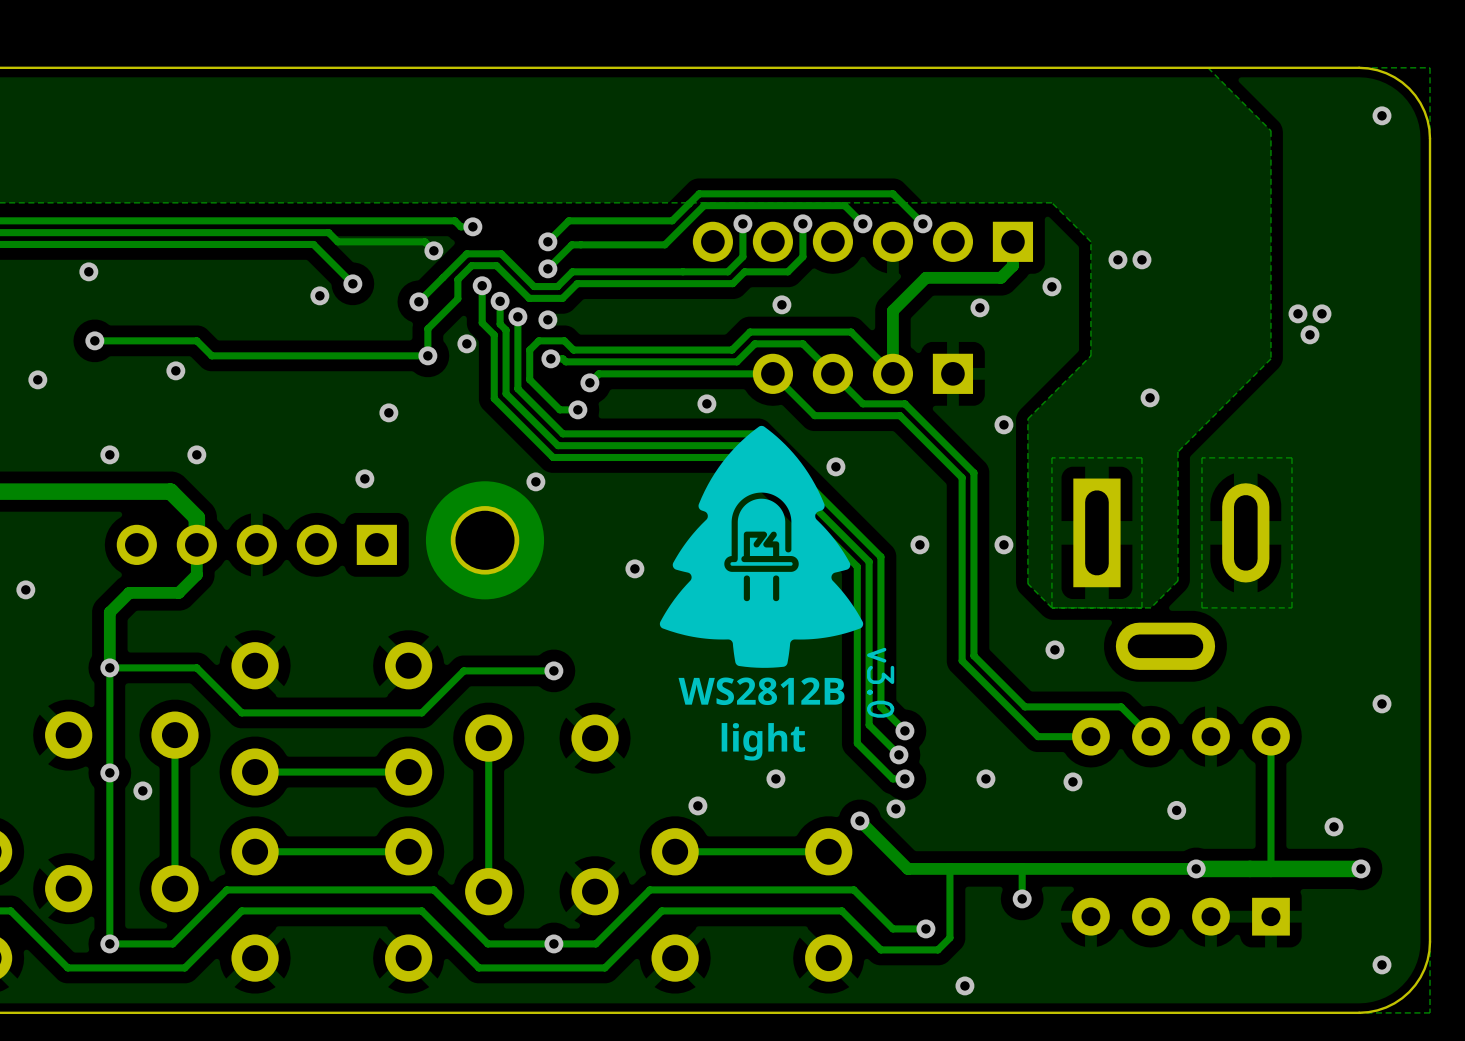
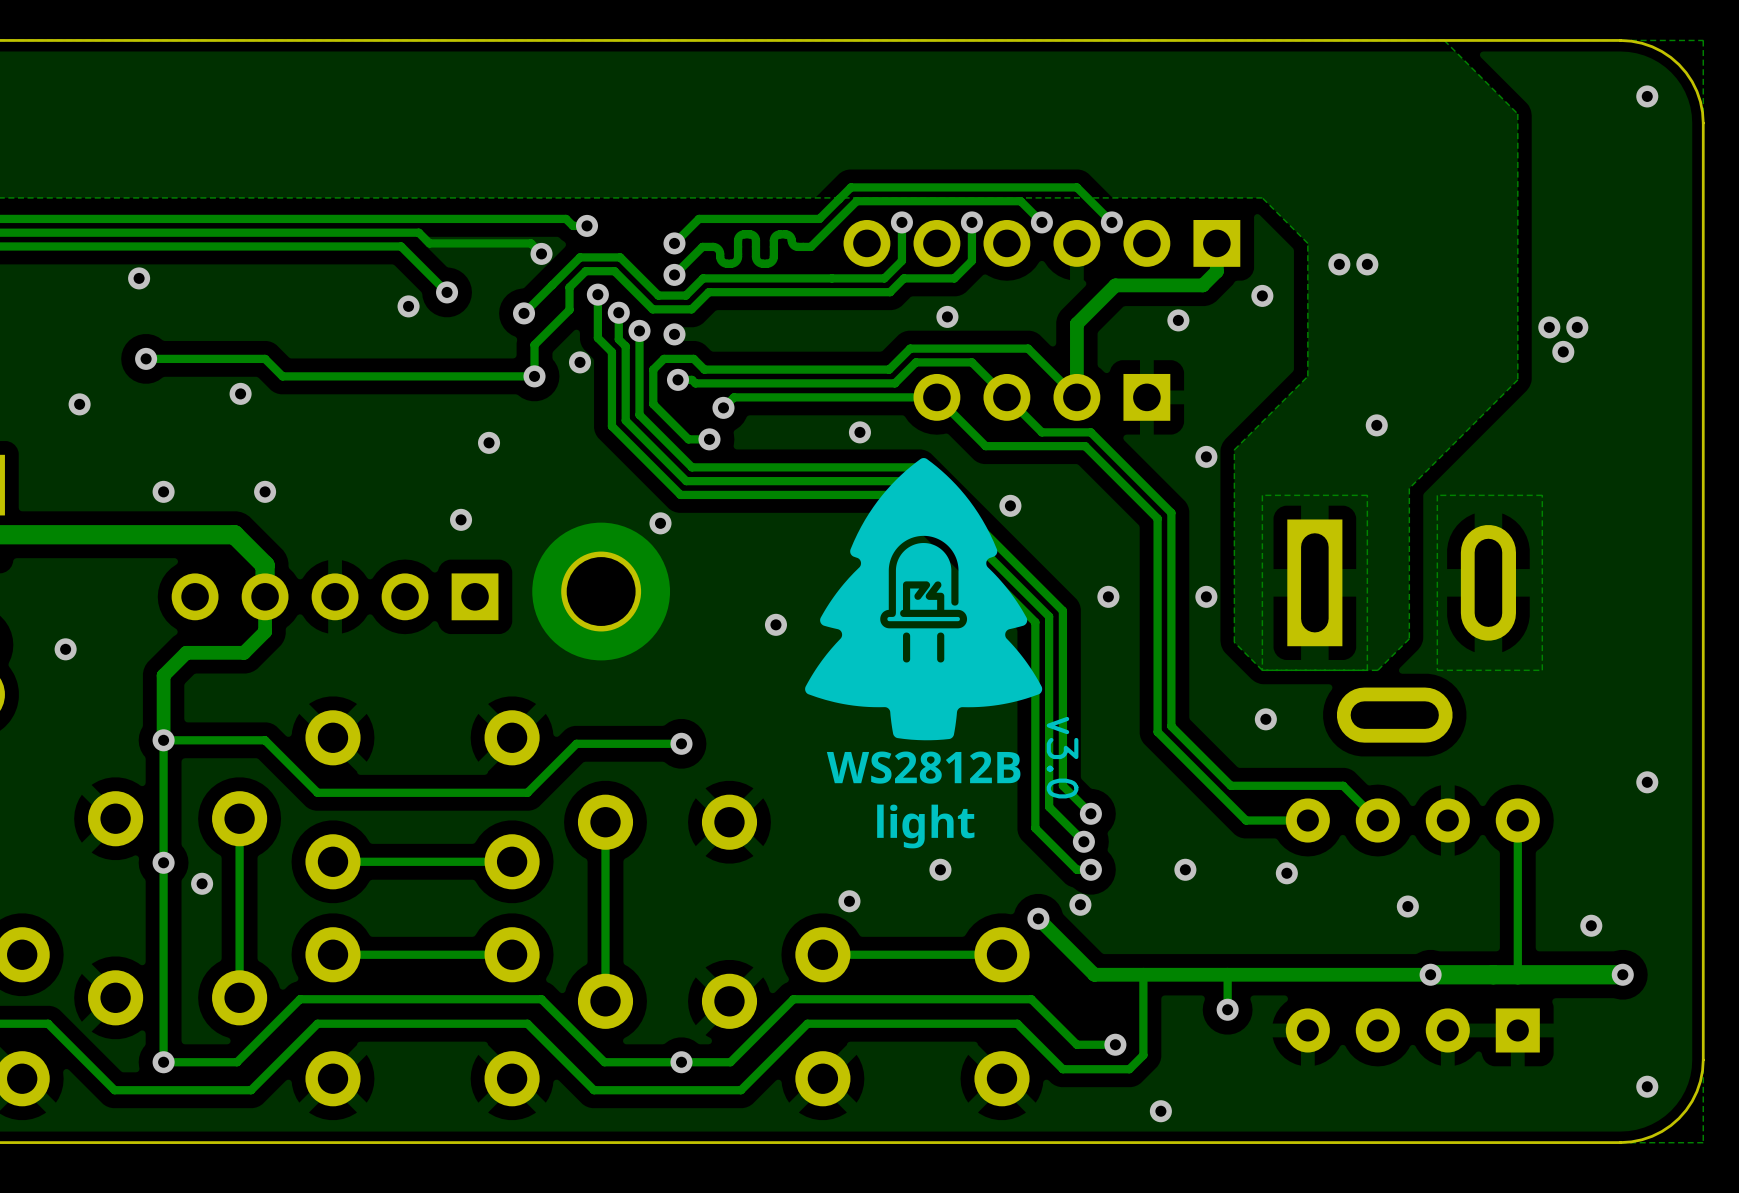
track: (653, 244) (580, 244) -> (798, 246) (793, 244) (788, 235) (777, 235) (773, 239) (773, 258) (766, 263) (760, 263) (756, 259) (755, 239) (751, 234) (742, 234) (739, 237) (737, 258) (733, 263) (722, 262) (719, 250) (712, 246)

